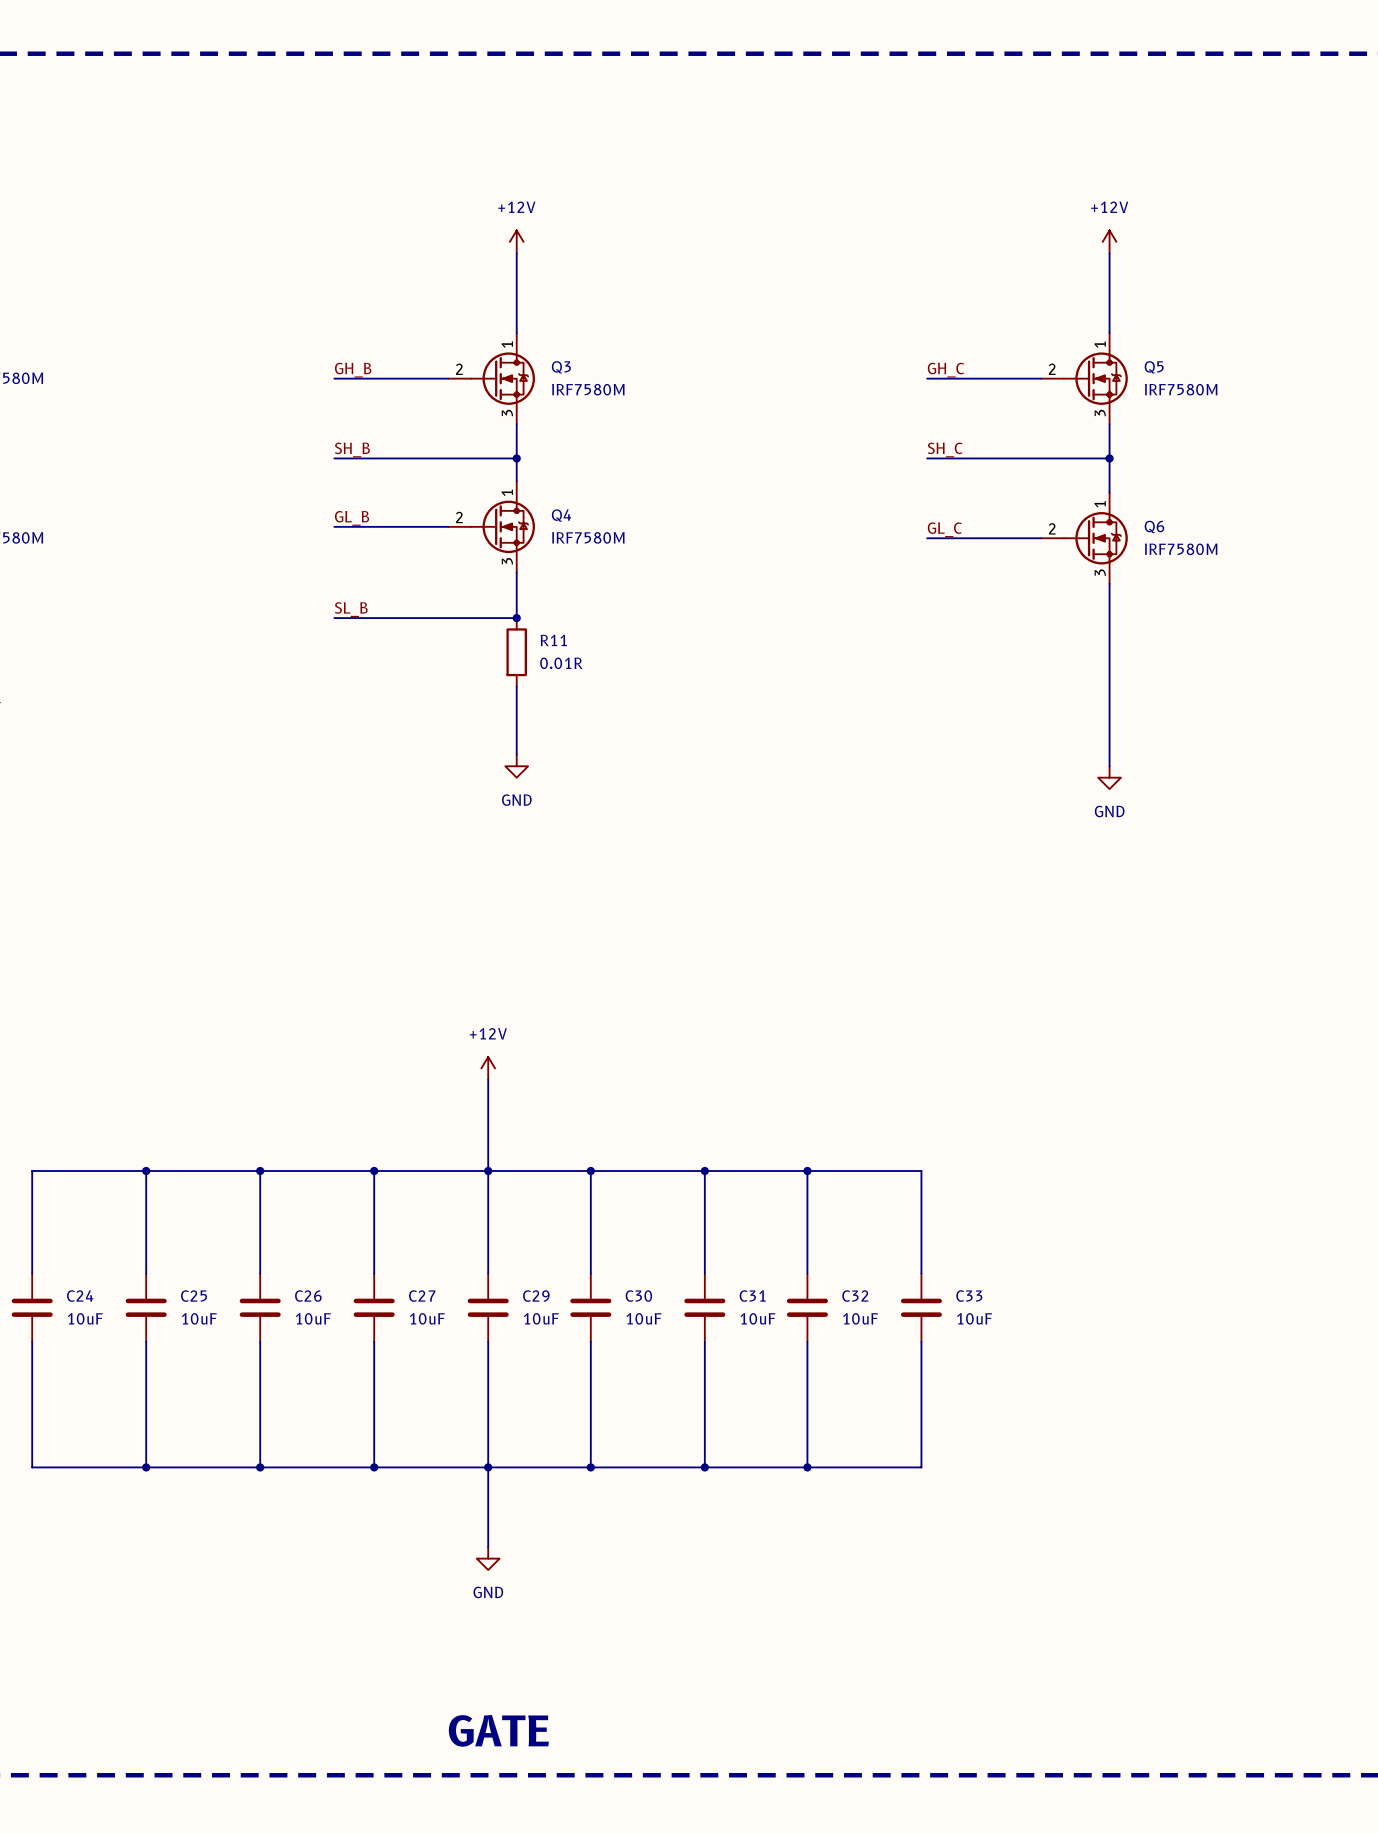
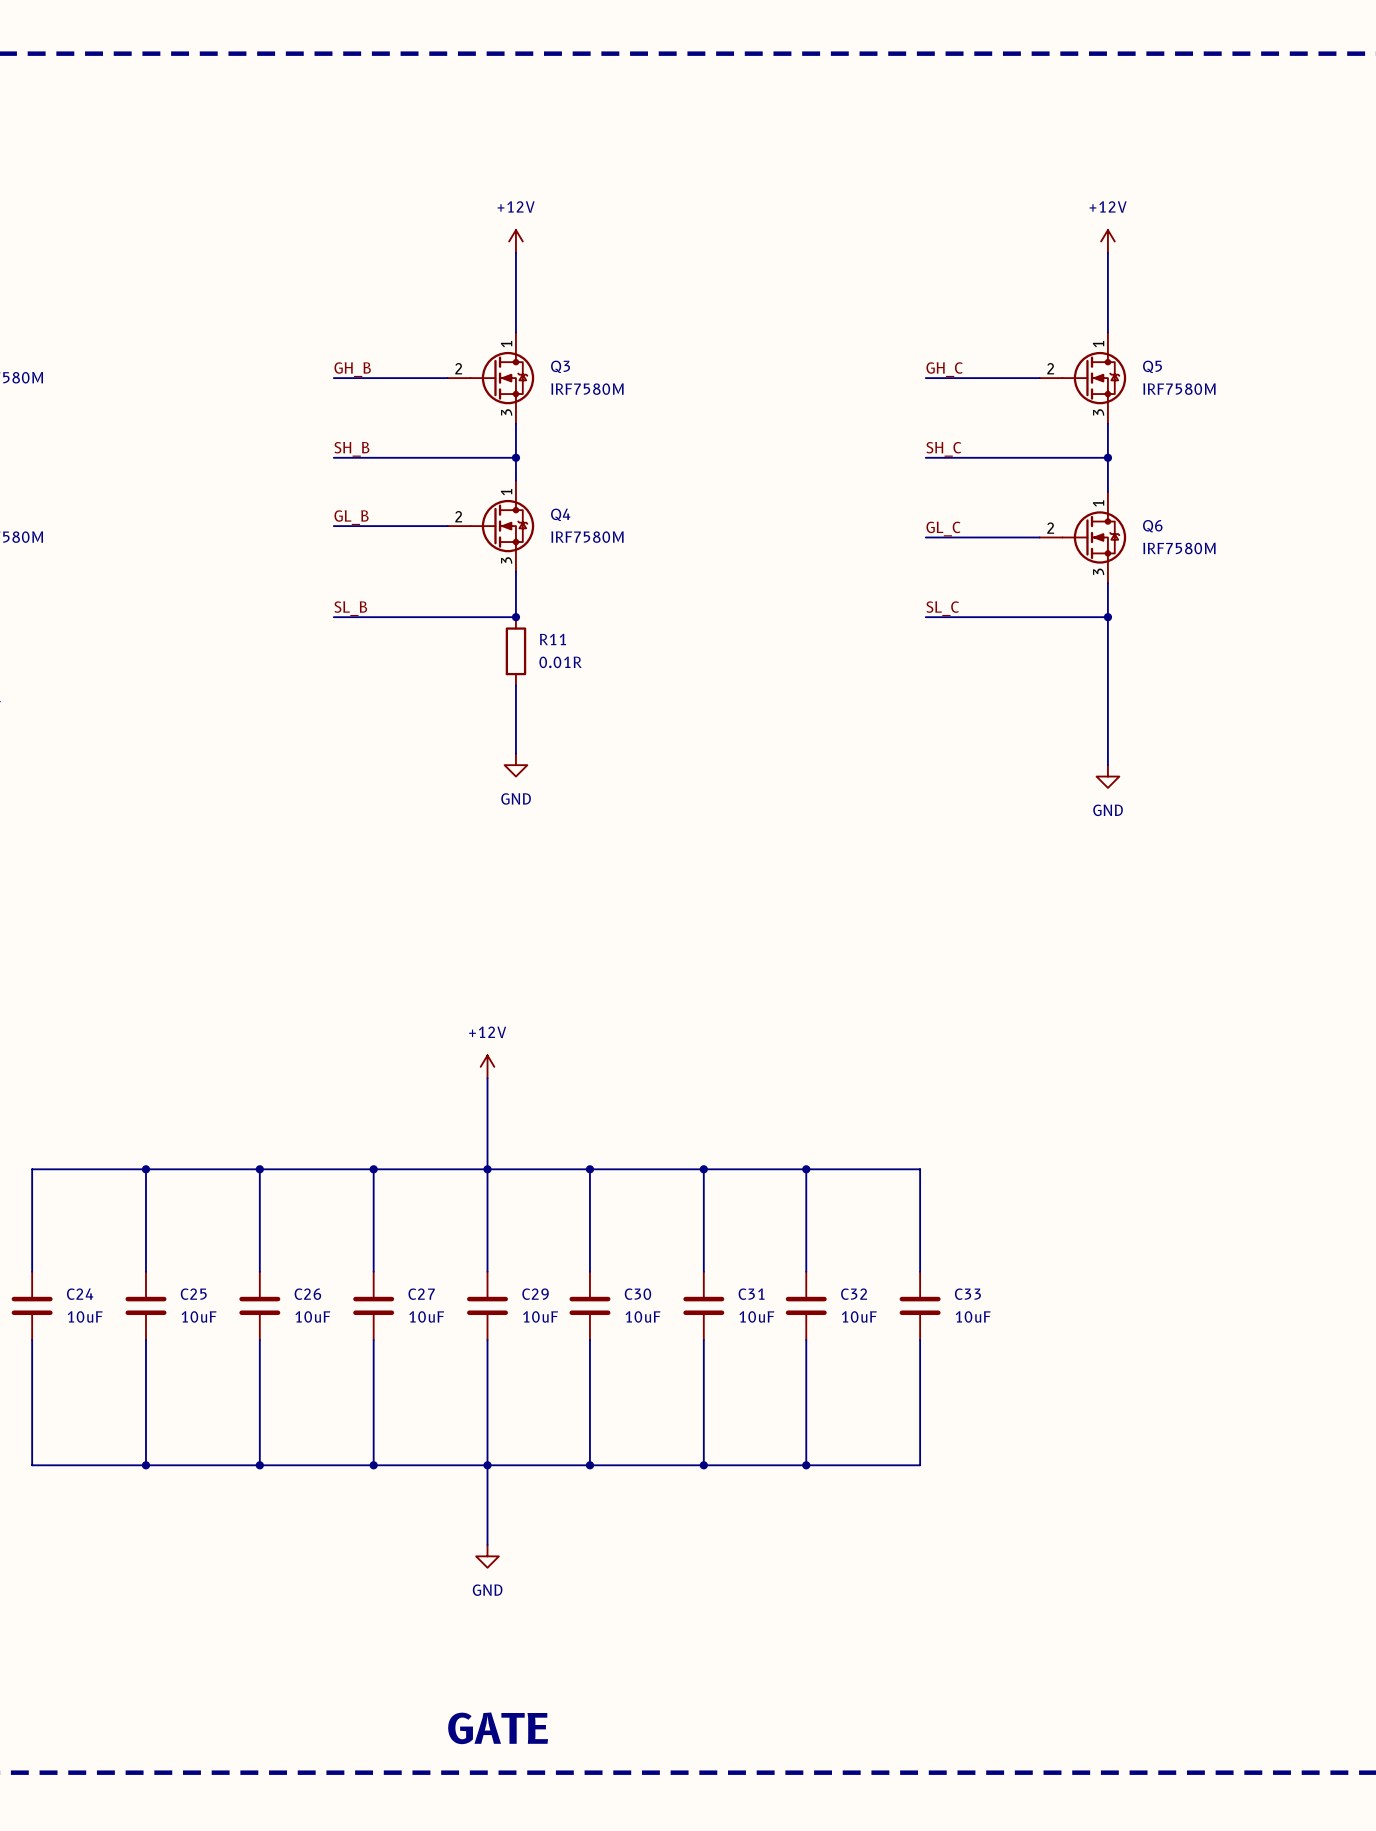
label: none -> SL_C (942, 608)
wire: none -> (925, 617) (1107, 617)
junction: none -> (1107, 617)

